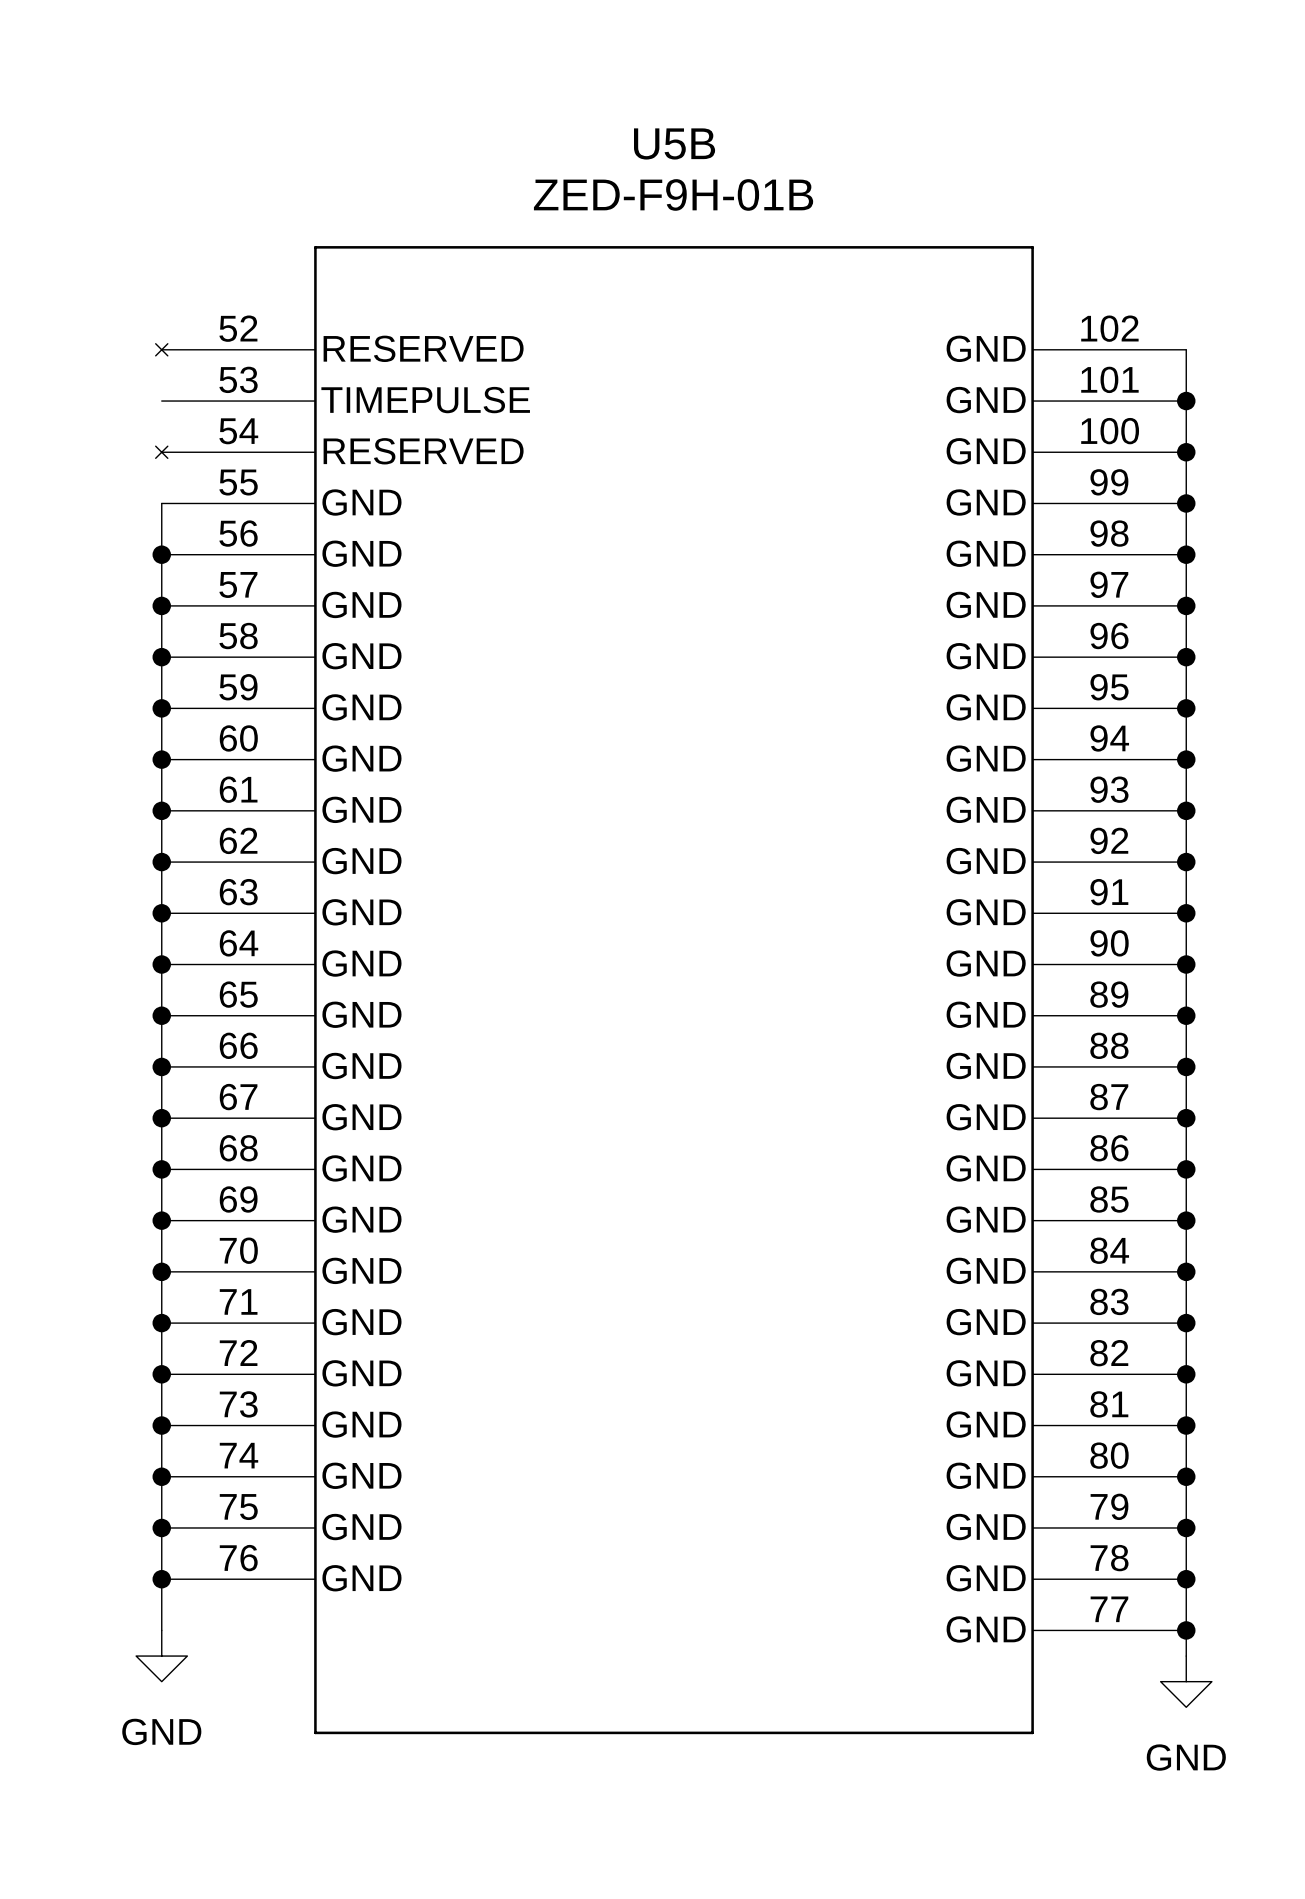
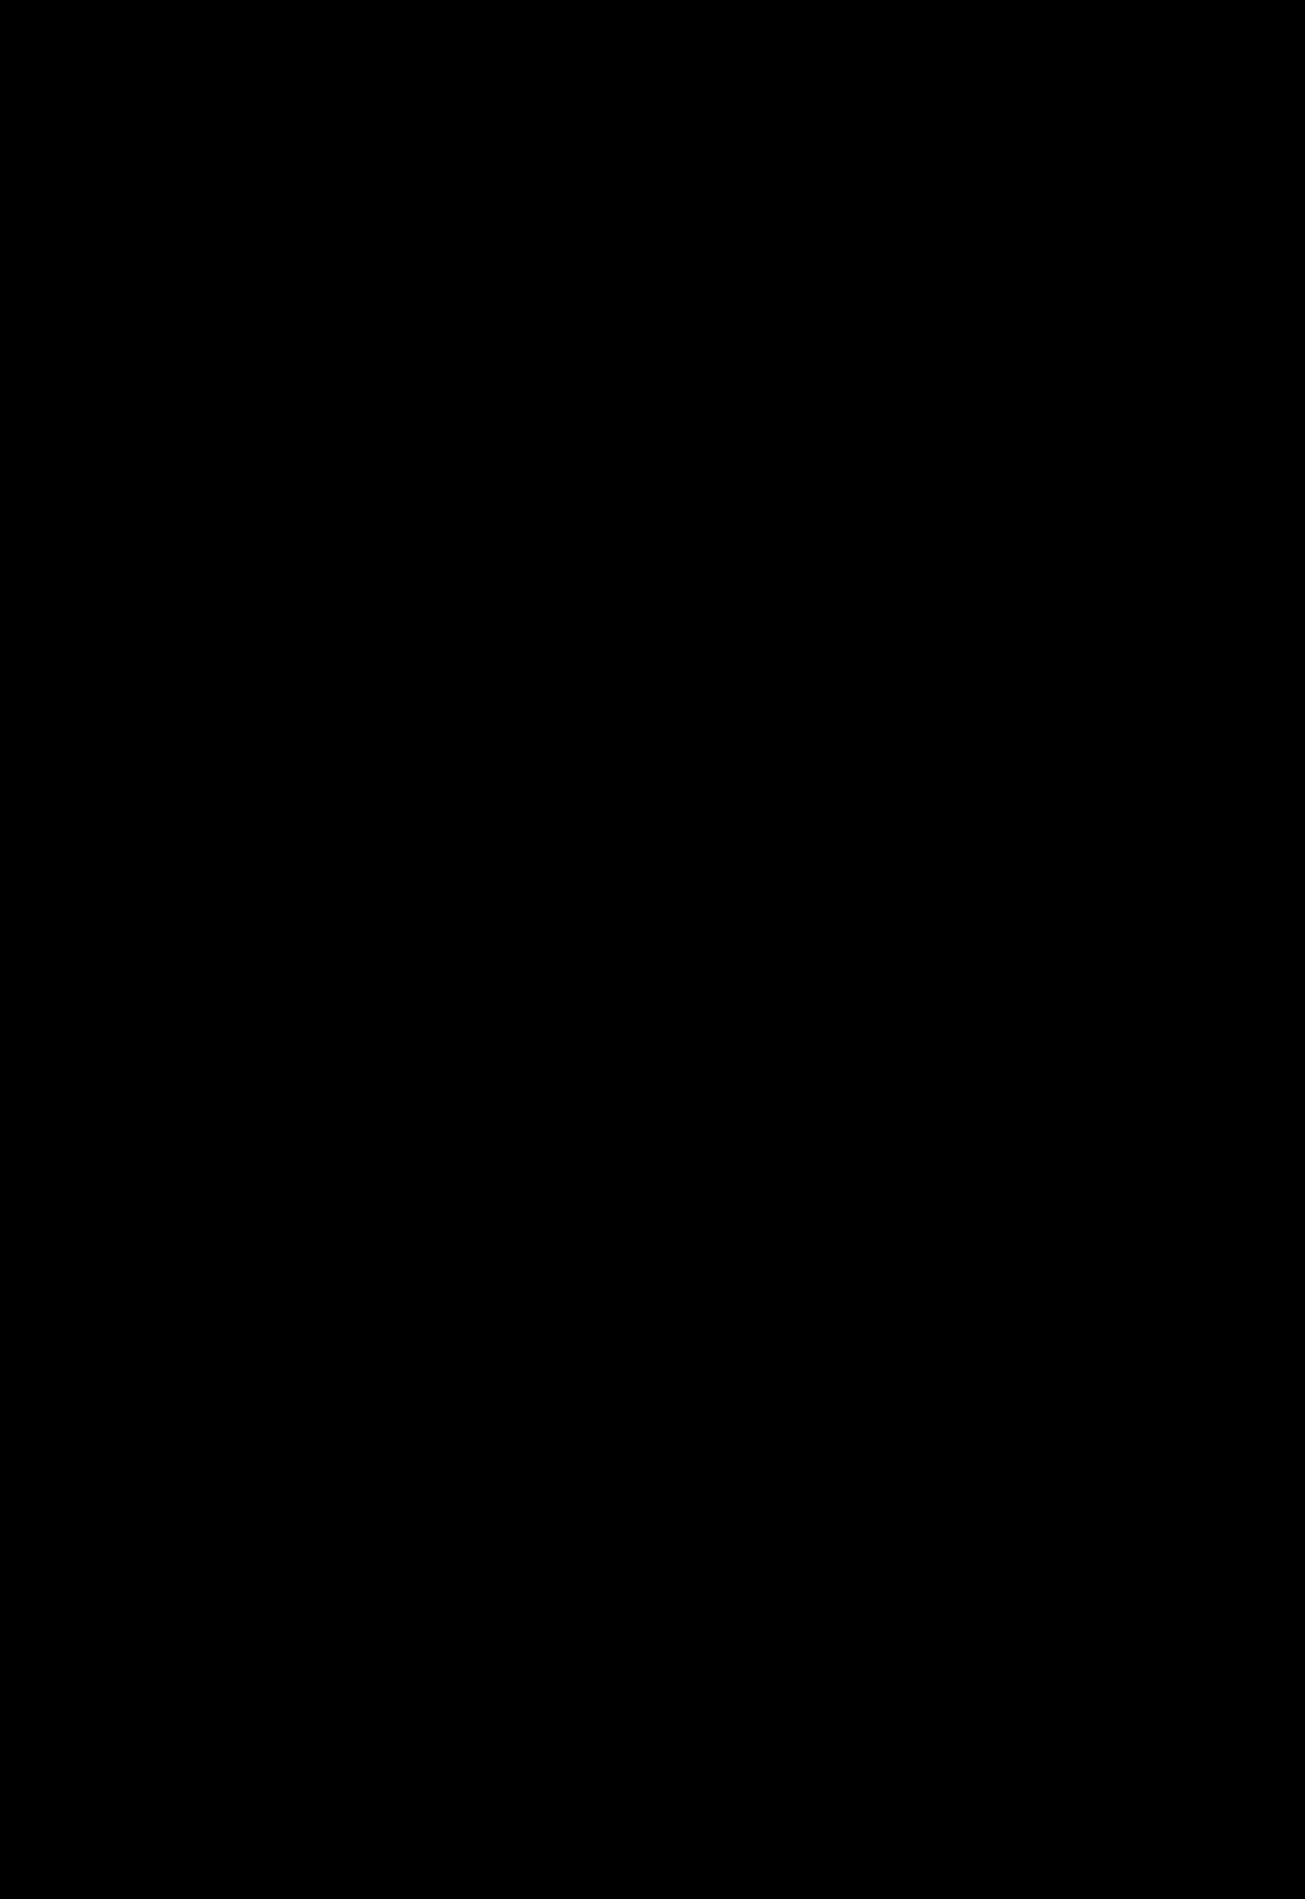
wire: (1186, 349) (1186, 1656) -> none
junction: (1186, 401) -> none
junction: (1186, 452) -> none
wire: (161, 503) (161, 1630) -> none
junction: (1186, 503) -> none
junction: (161, 554) -> none
junction: (1186, 554) -> none
junction: (161, 605) -> none
junction: (1186, 605) -> none
junction: (161, 657) -> none
junction: (1186, 657) -> none
junction: (161, 708) -> none
junction: (1186, 708) -> none
junction: (161, 759) -> none
junction: (1186, 759) -> none
junction: (161, 810) -> none
junction: (1186, 810) -> none
junction: (161, 862) -> none
junction: (1186, 862) -> none
junction: (161, 913) -> none
junction: (1186, 913) -> none
junction: (161, 964) -> none
junction: (1186, 964) -> none
U5B: ZED-F9H-01B (670, 990) -> none
junction: (161, 1015) -> none
junction: (1186, 1015) -> none
junction: (161, 1066) -> none
junction: (1186, 1066) -> none
junction: (161, 1118) -> none
junction: (1186, 1118) -> none
junction: (161, 1169) -> none
junction: (1186, 1169) -> none
junction: (161, 1220) -> none
junction: (1186, 1220) -> none
junction: (161, 1271) -> none
junction: (1186, 1271) -> none
junction: (161, 1323) -> none
junction: (1186, 1323) -> none
junction: (161, 1374) -> none
junction: (1186, 1374) -> none
junction: (161, 1425) -> none
junction: (1186, 1425) -> none
junction: (161, 1476) -> none
junction: (1186, 1476) -> none
junction: (161, 1527) -> none
junction: (1186, 1527) -> none
junction: (161, 1579) -> none
junction: (1186, 1579) -> none
junction: (1186, 1630) -> none
power symbol: GND (161, 1656) -> none
power symbol: GND (1186, 1681) -> none

